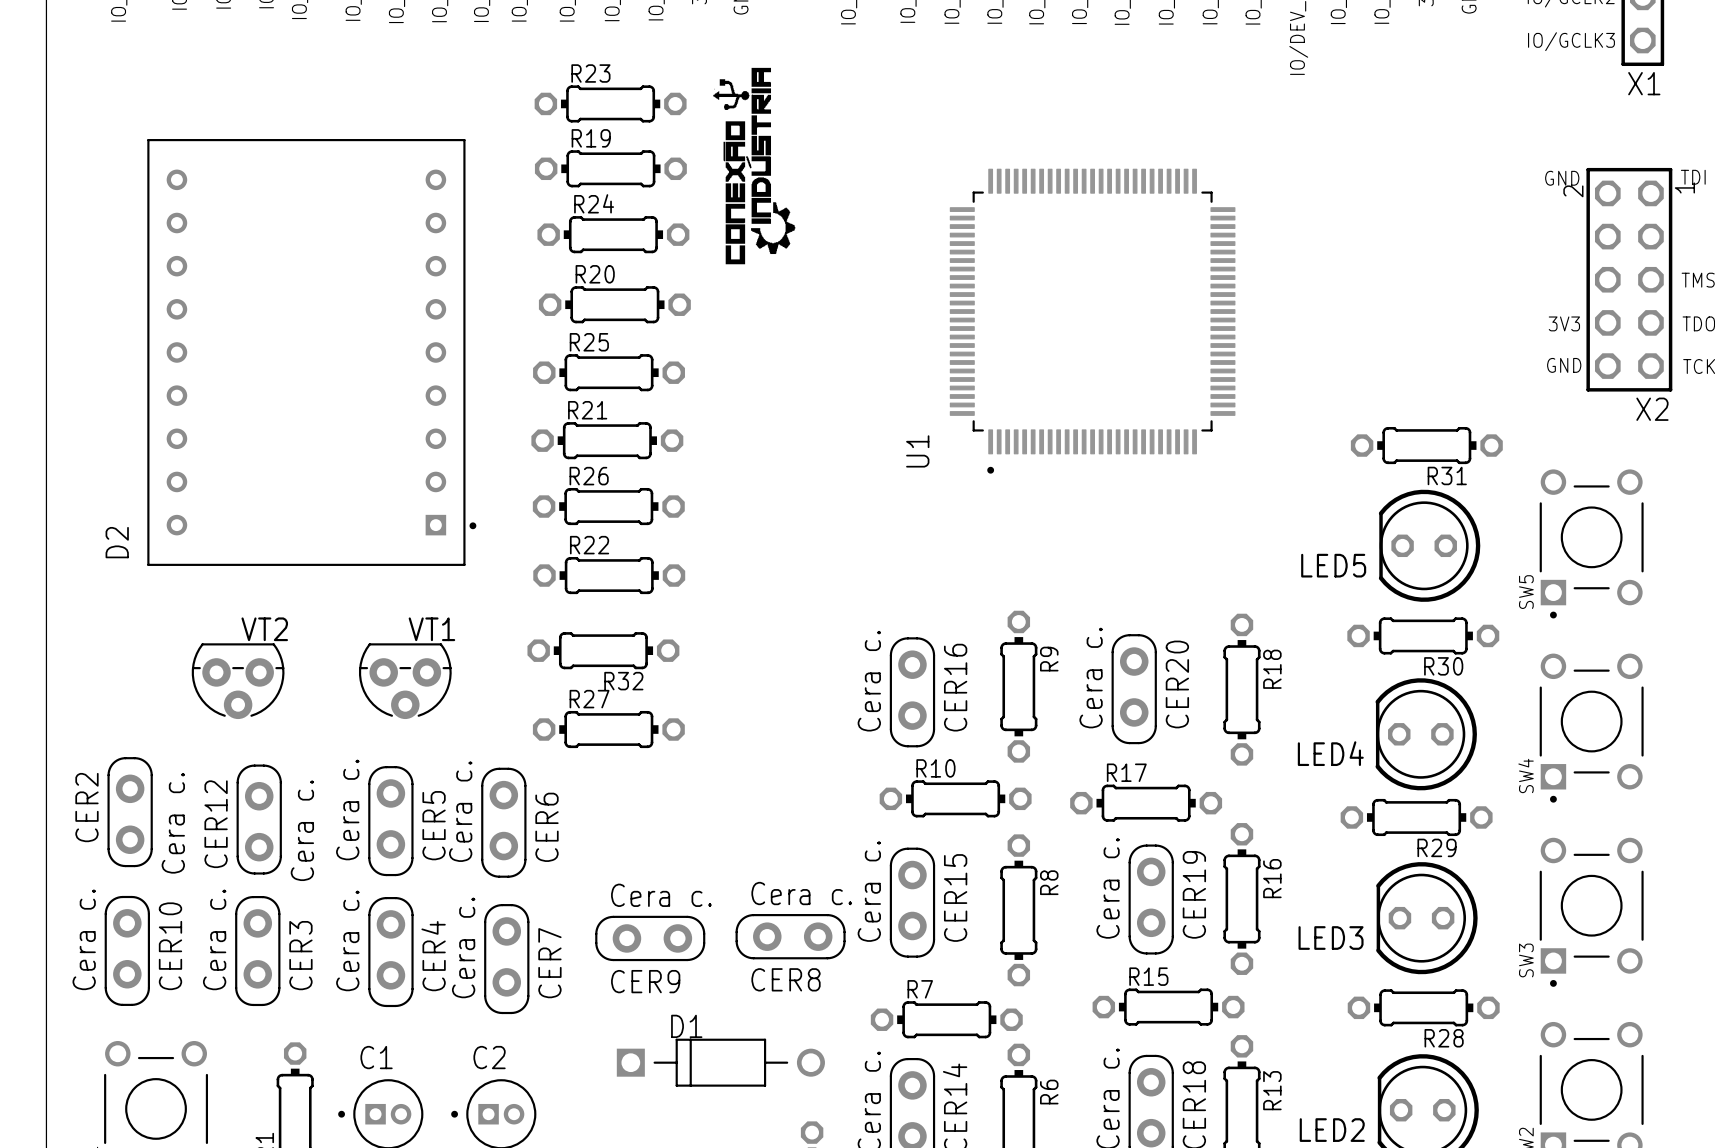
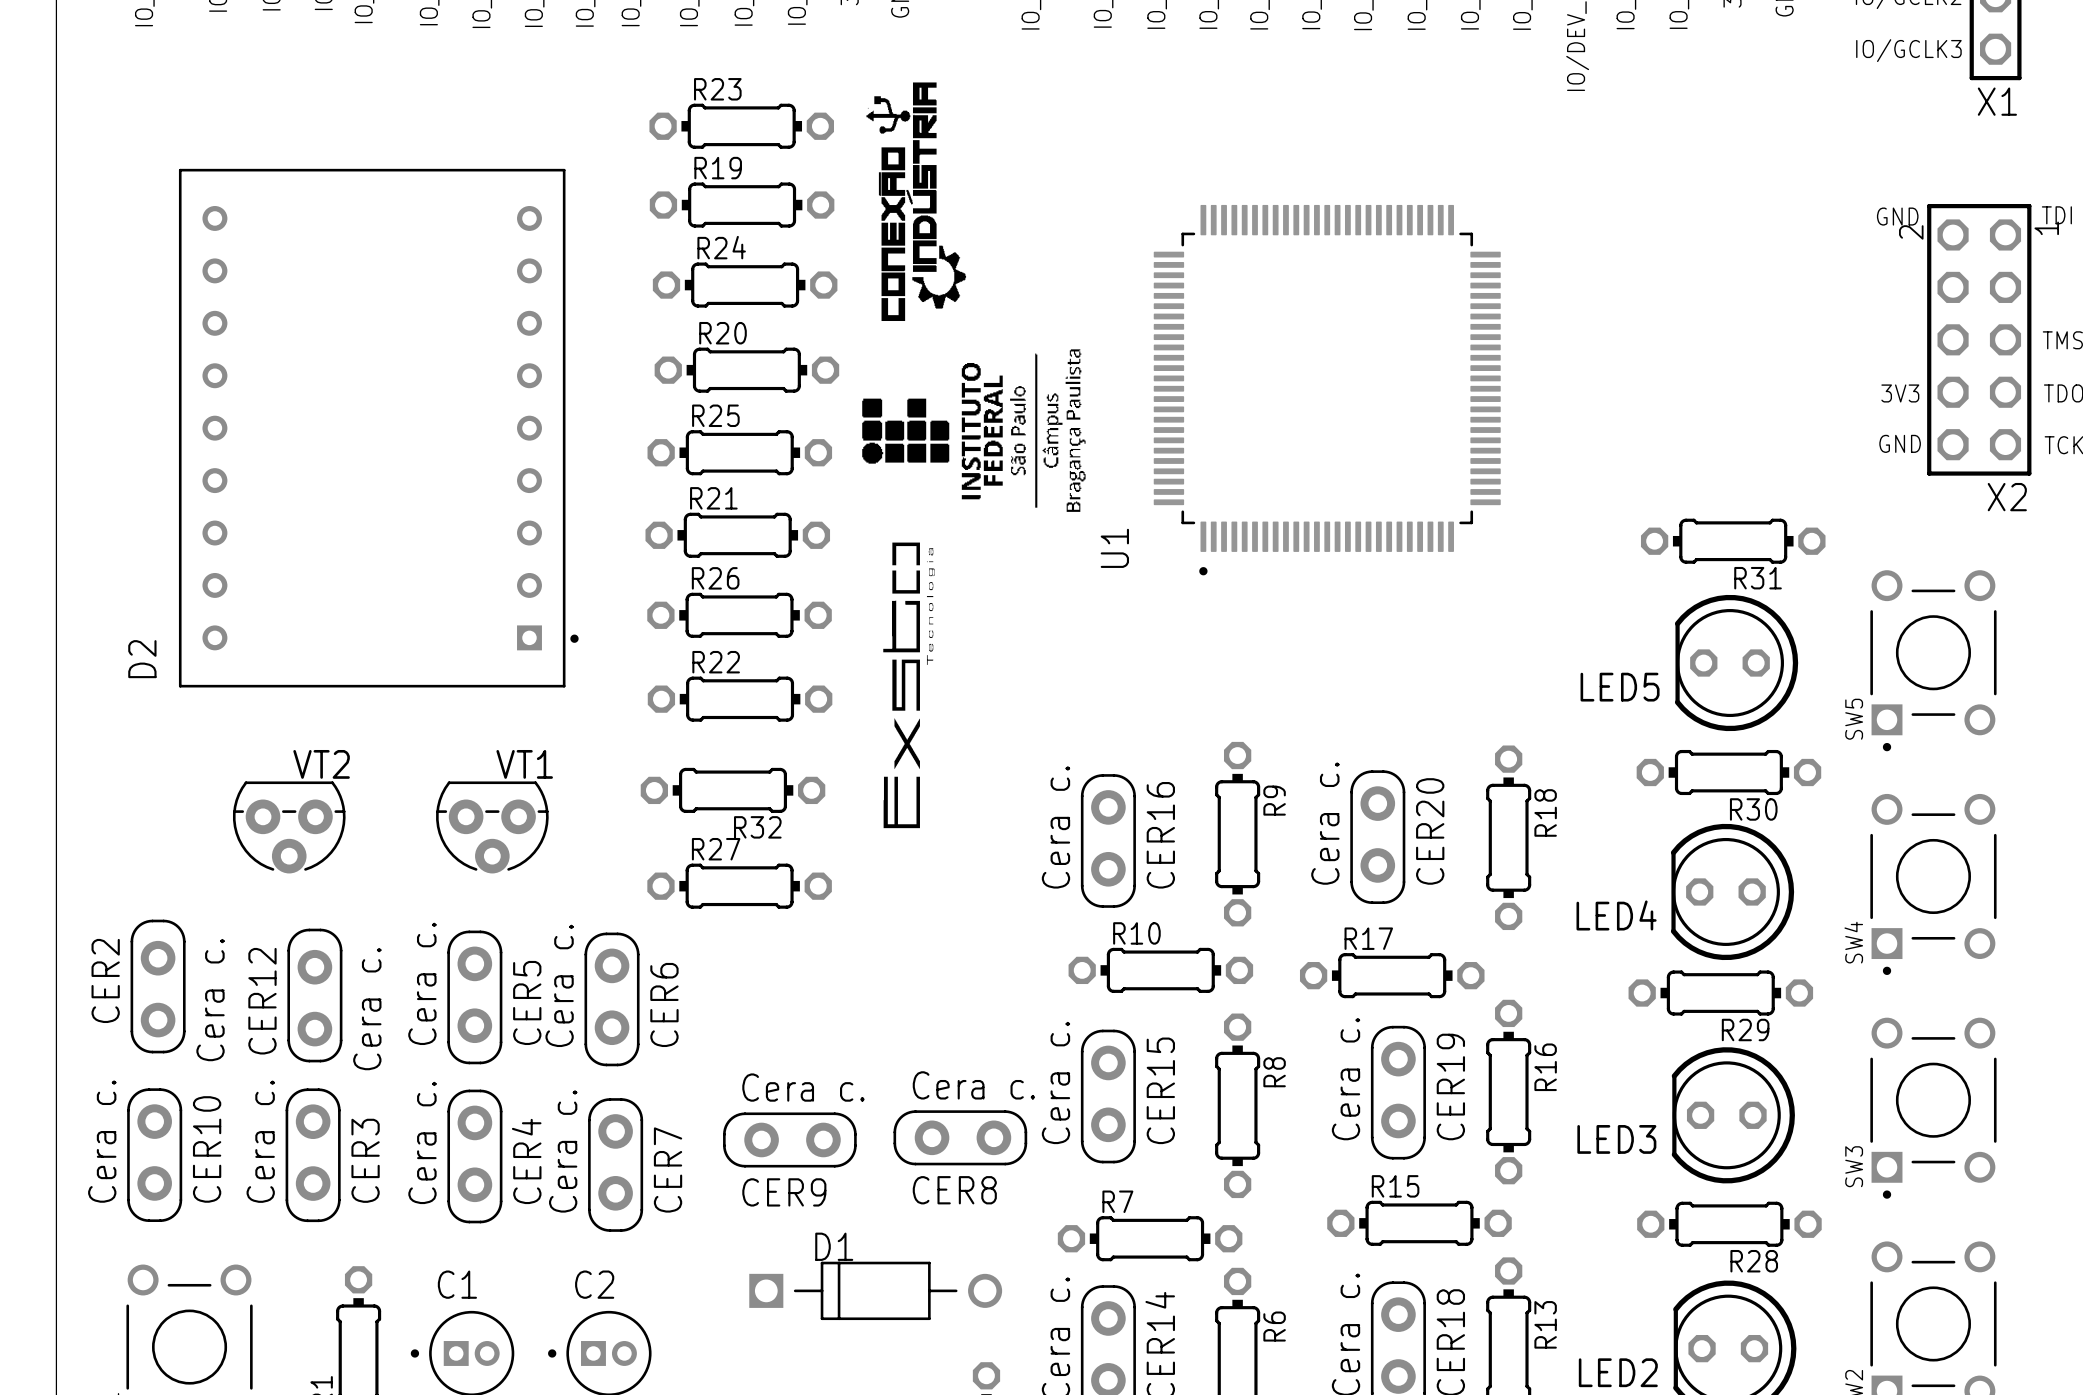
drawing: none -> [862, 349, 1086, 512]
drawing: none -> [883, 542, 935, 829]

